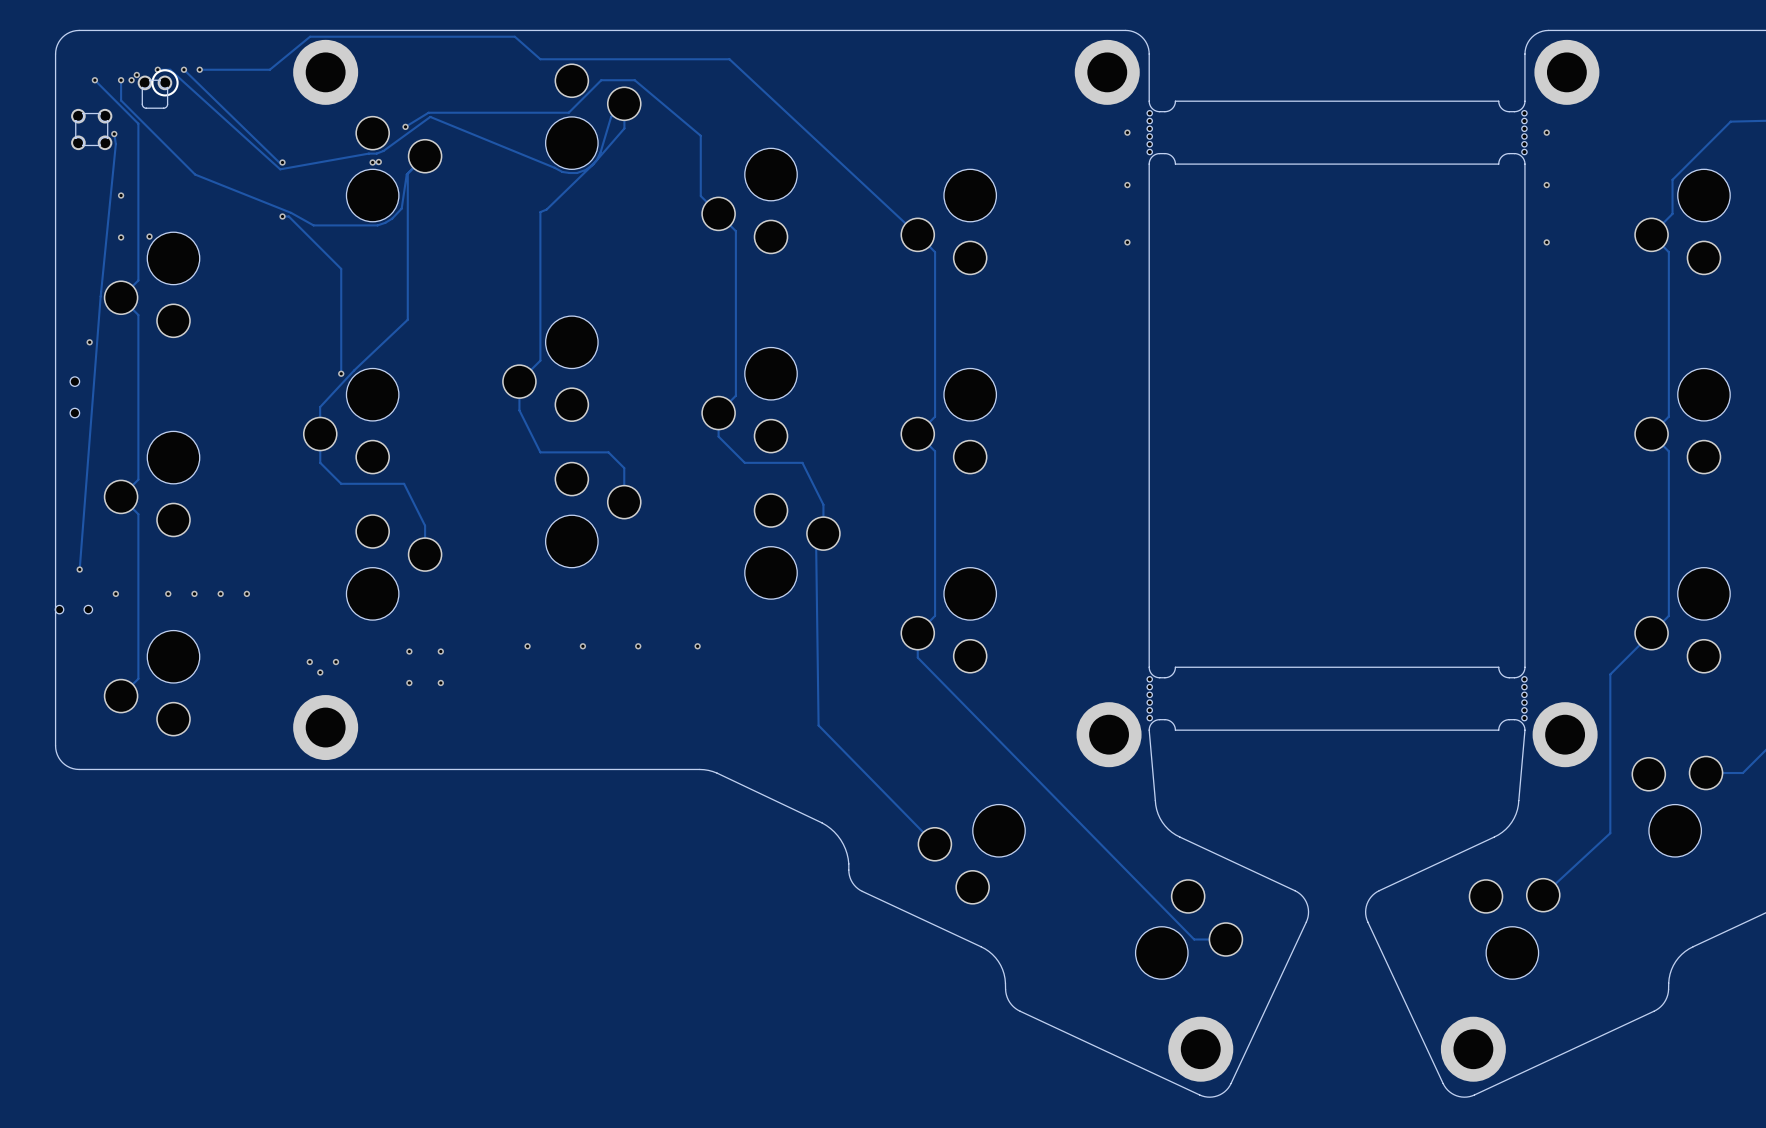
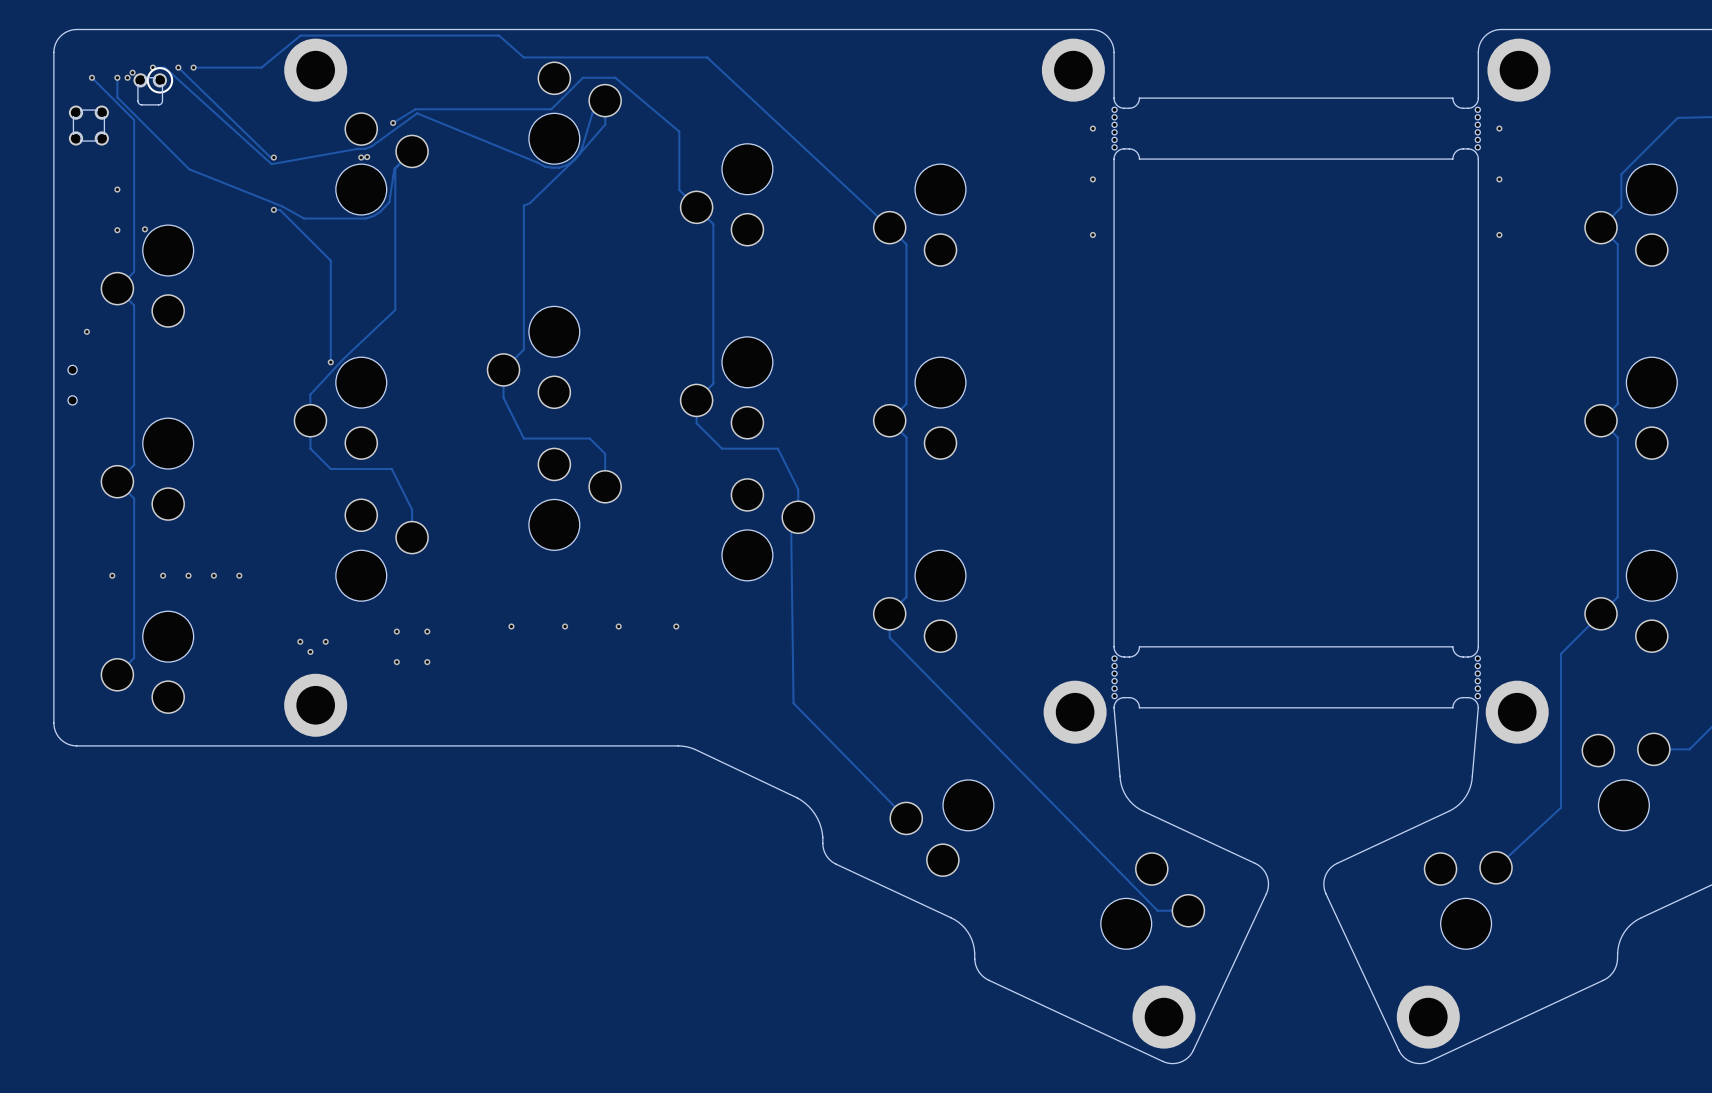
track: (114, 134) (115, 143) (100, 296) (79, 569) -> none
via: (114, 134) -> none
via: (79, 569) -> none
part: (73, 609) -> none

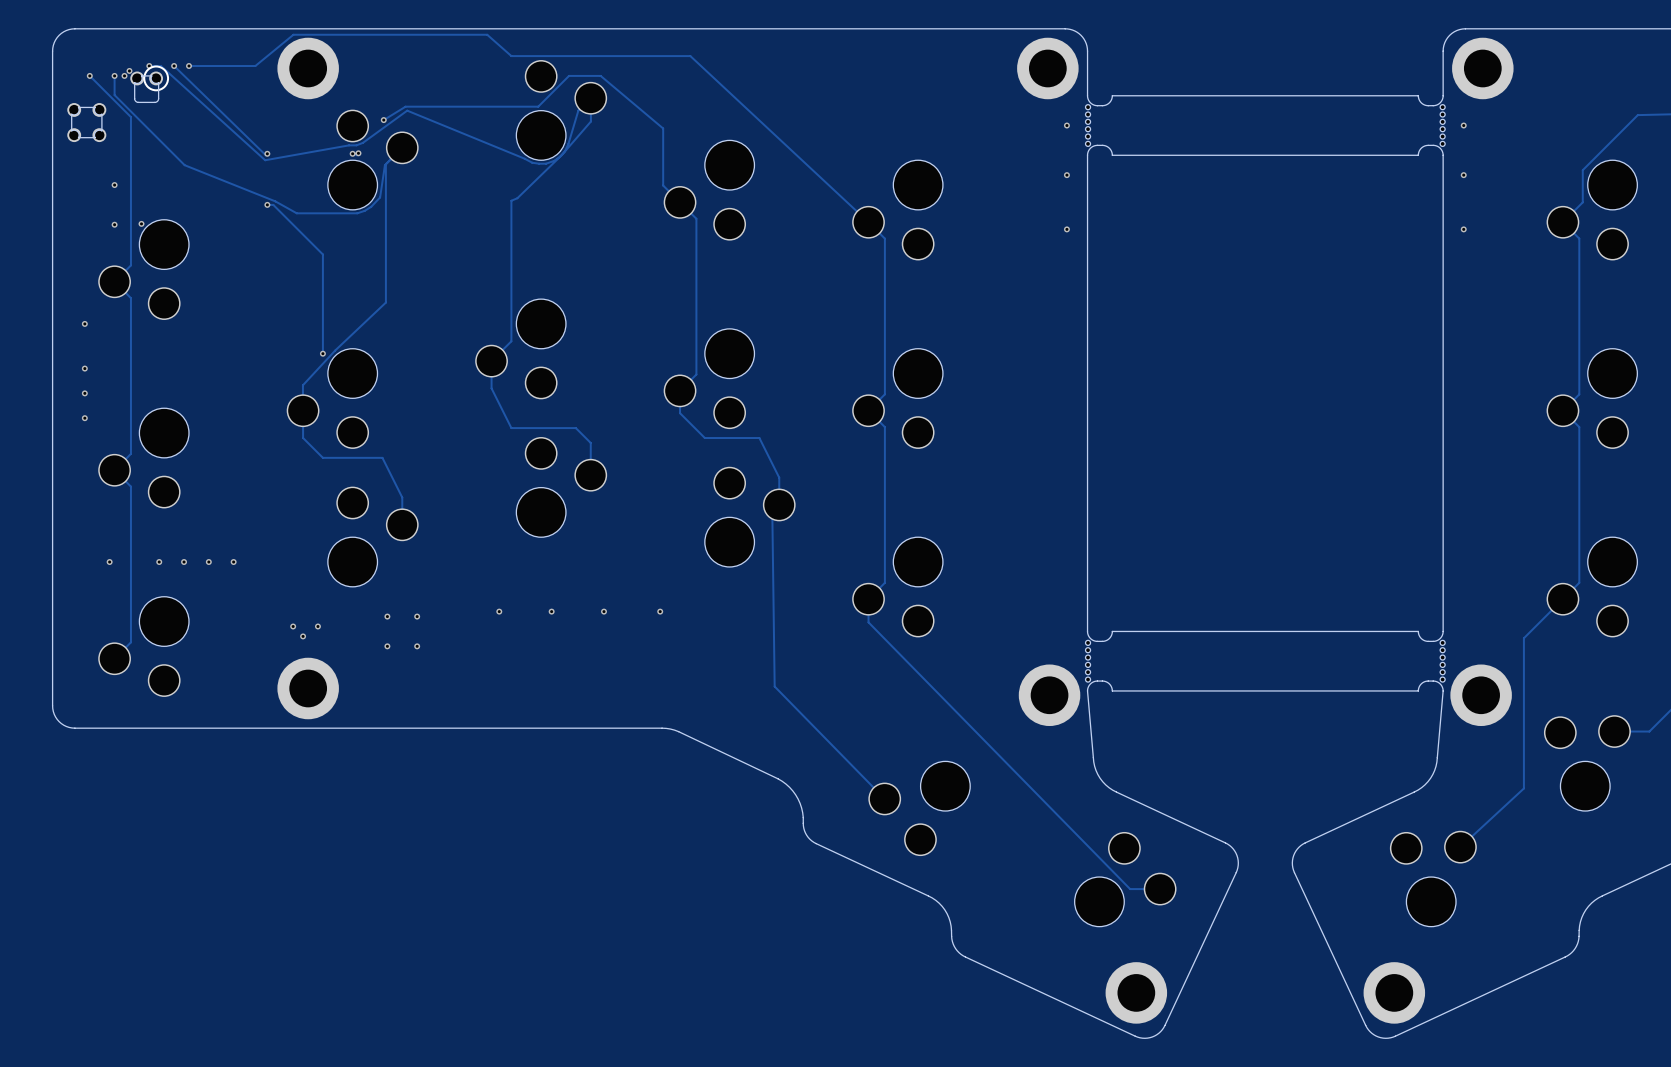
via: none -> (84, 368)
part: (72, 385) -> none
via: none -> (84, 393)
via: none -> (84, 418)

